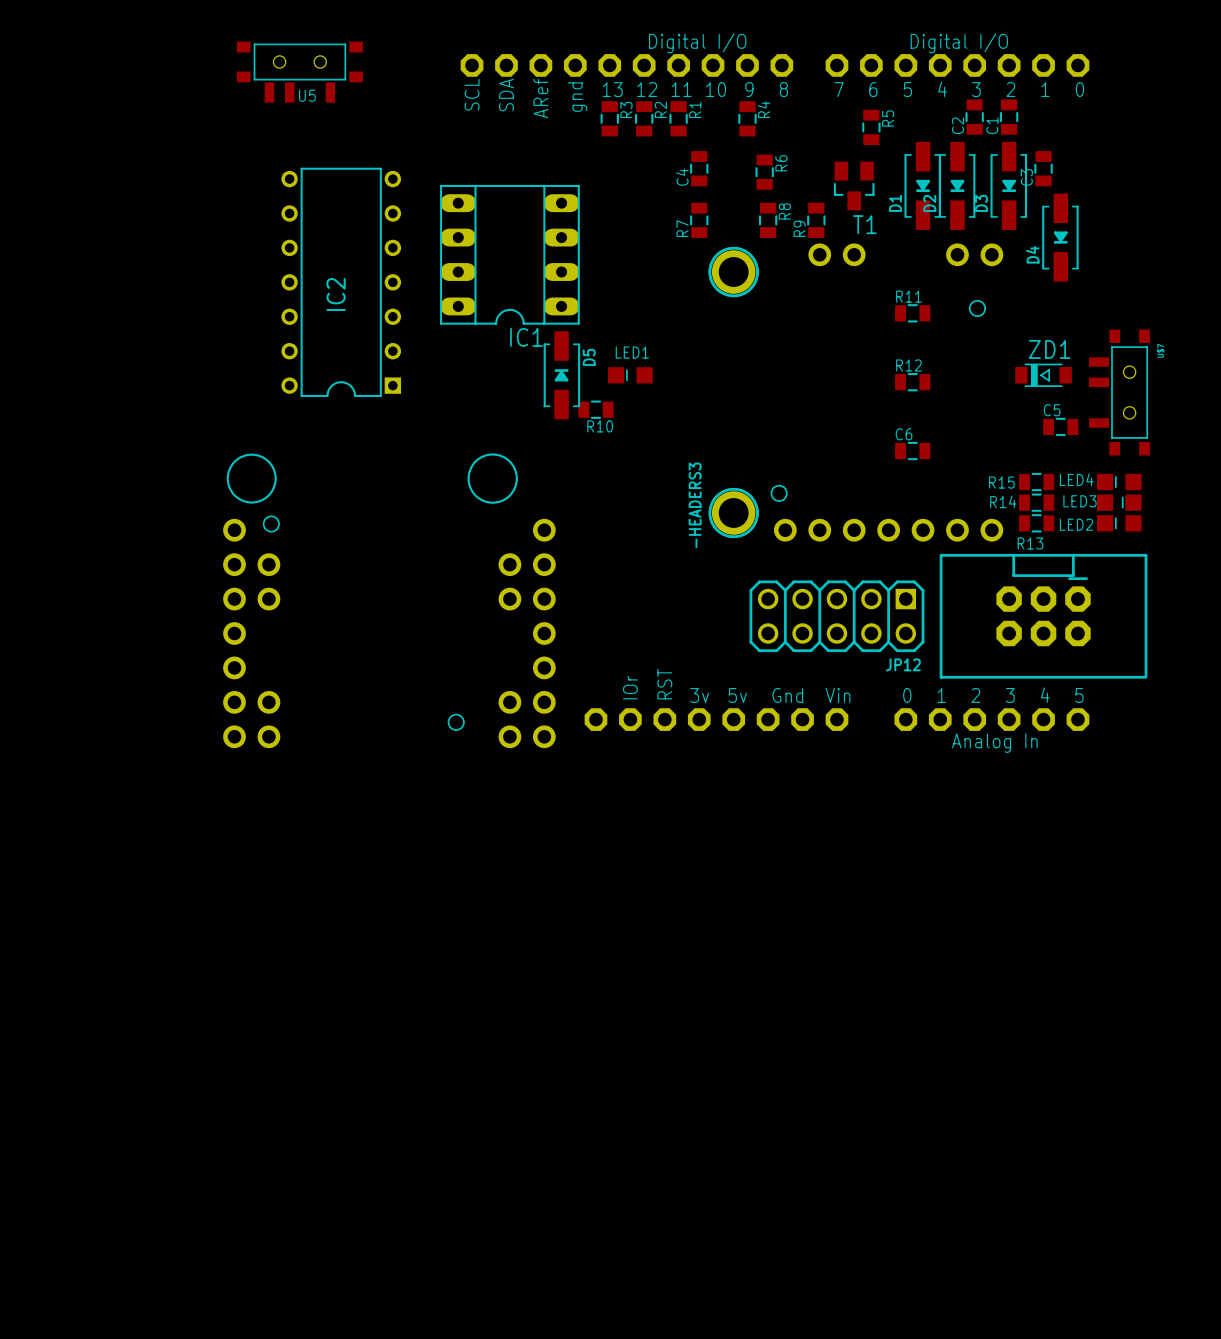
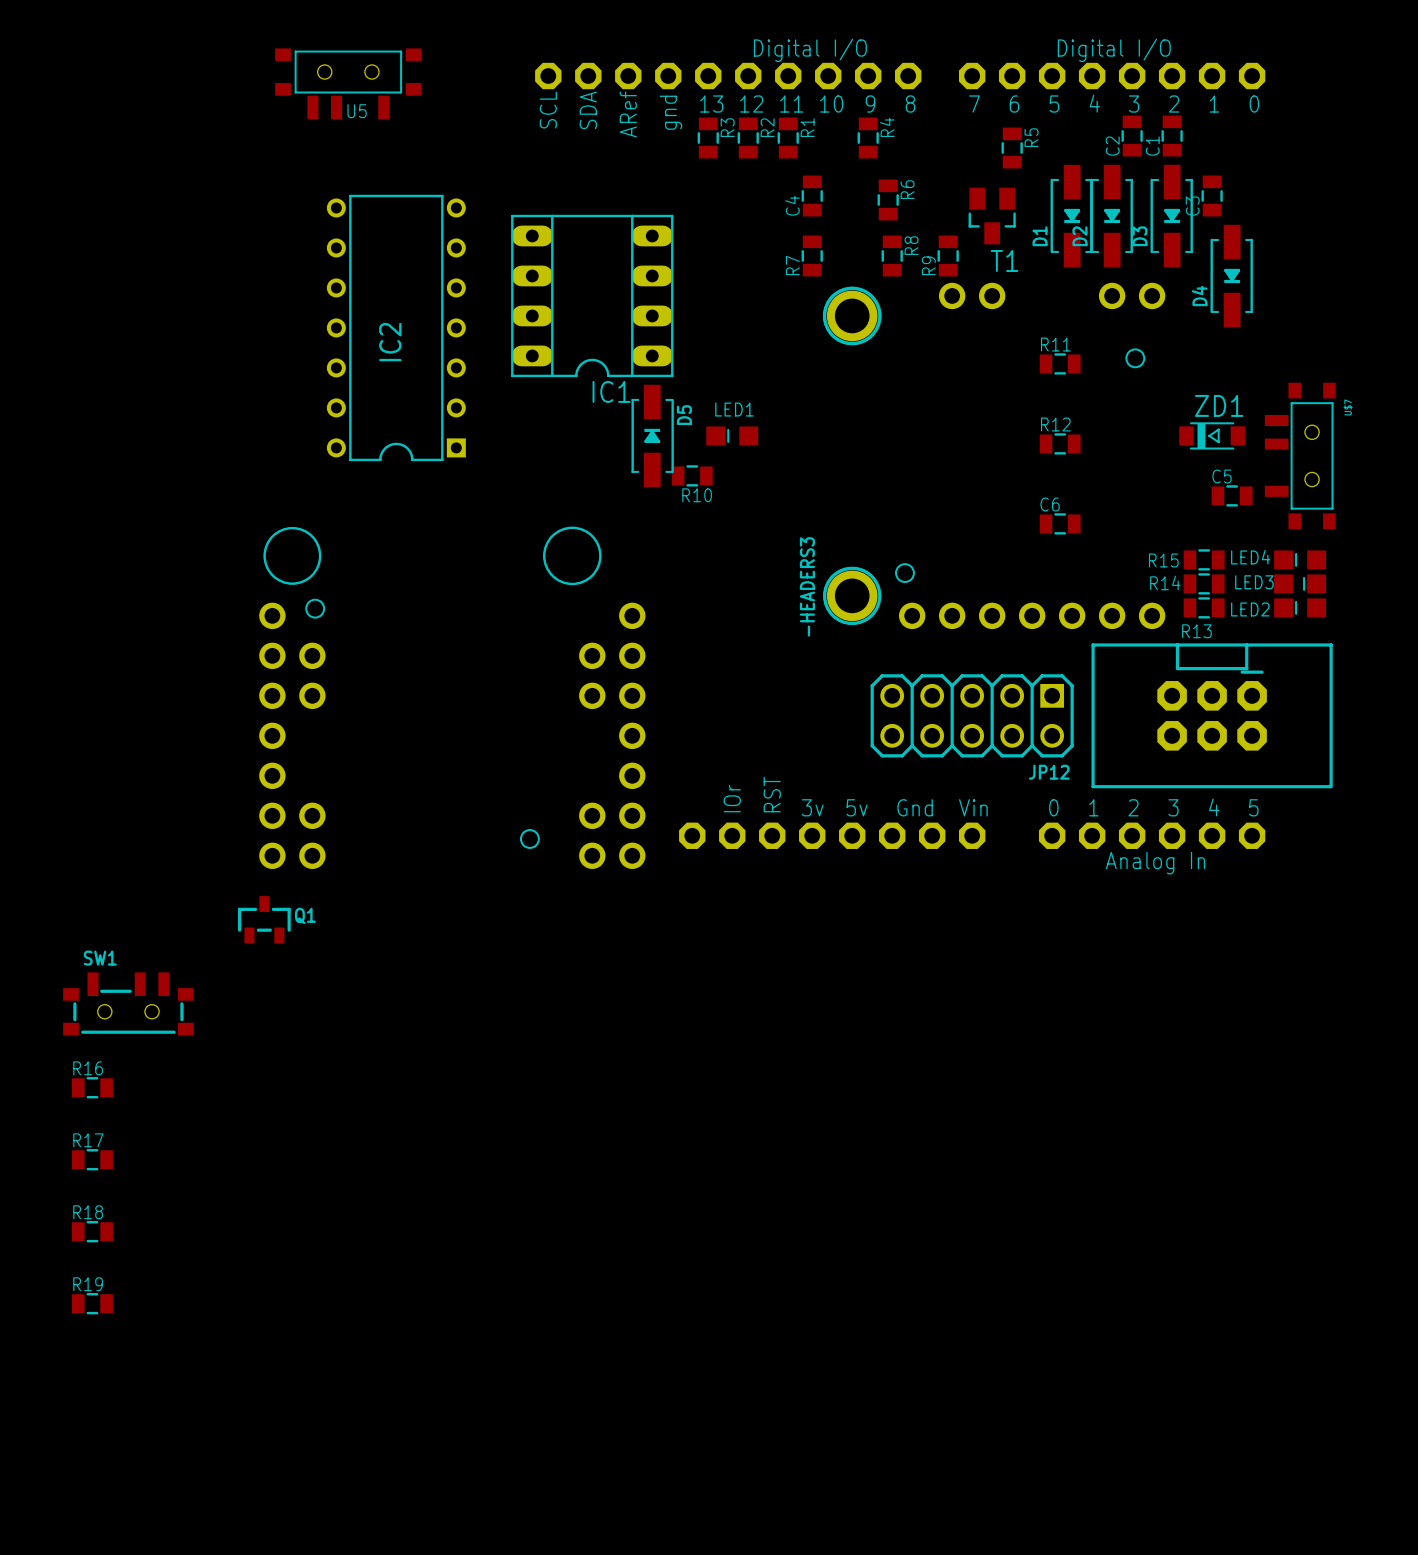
Q1: none -> (264, 919)
SW1: none -> (128, 1003)
R16: none -> (92, 1087)
R17: none -> (92, 1159)
R18: none -> (92, 1231)
R19: none -> (92, 1303)

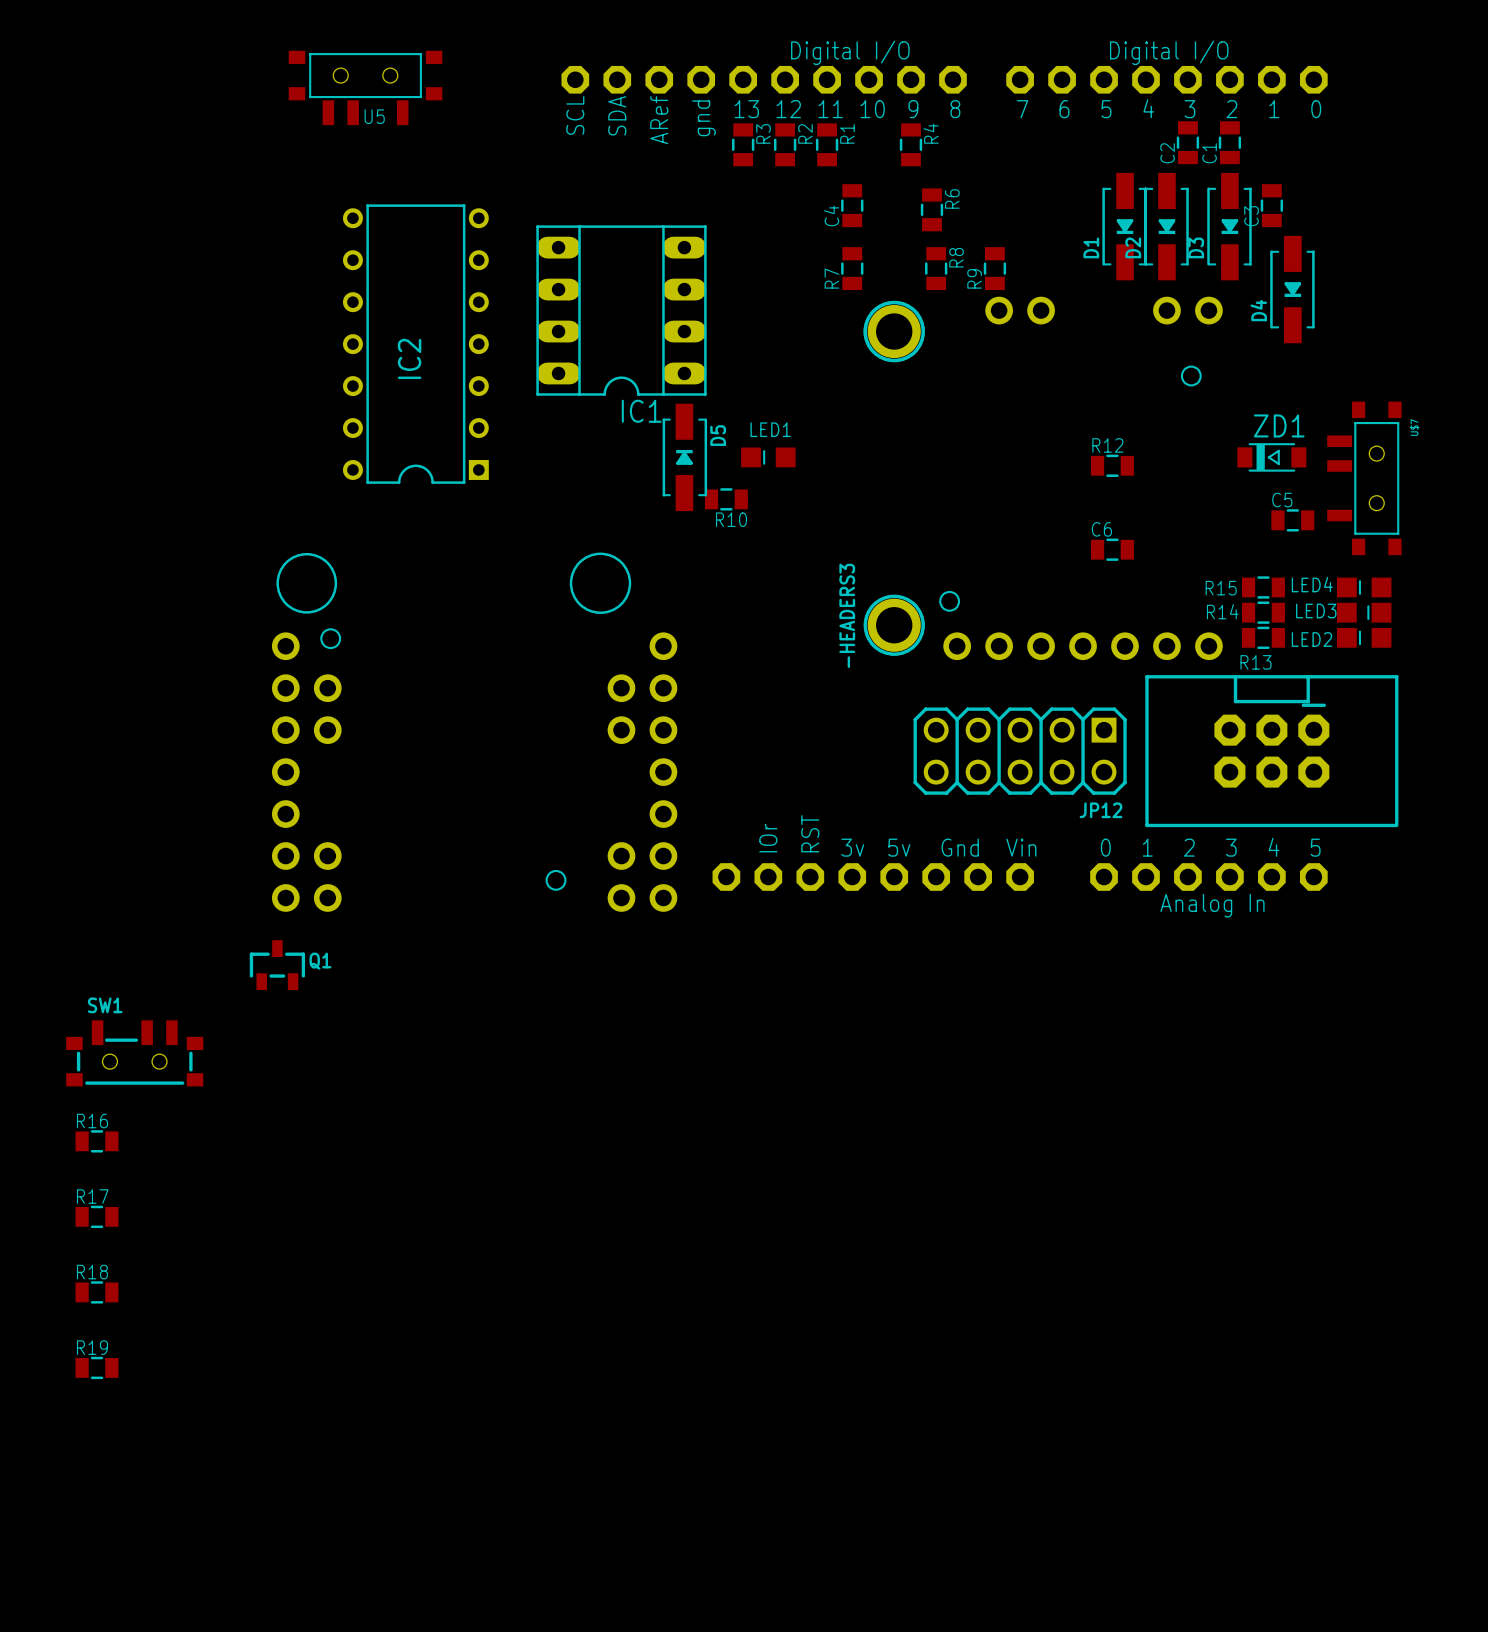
R5: (1012, 148) -> none
T1: (992, 215) -> none
R11: (1060, 363) -> none

